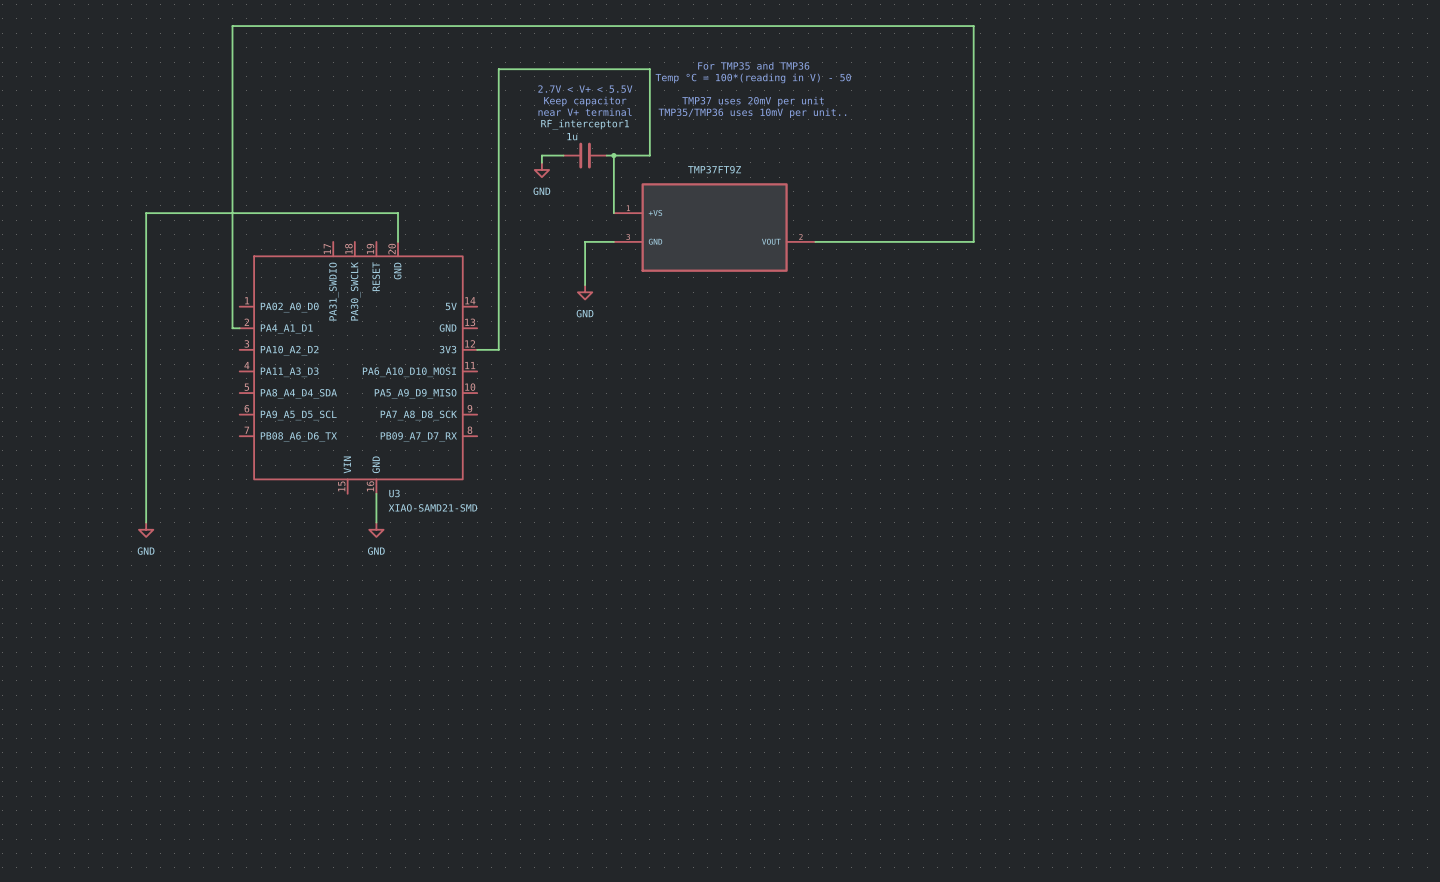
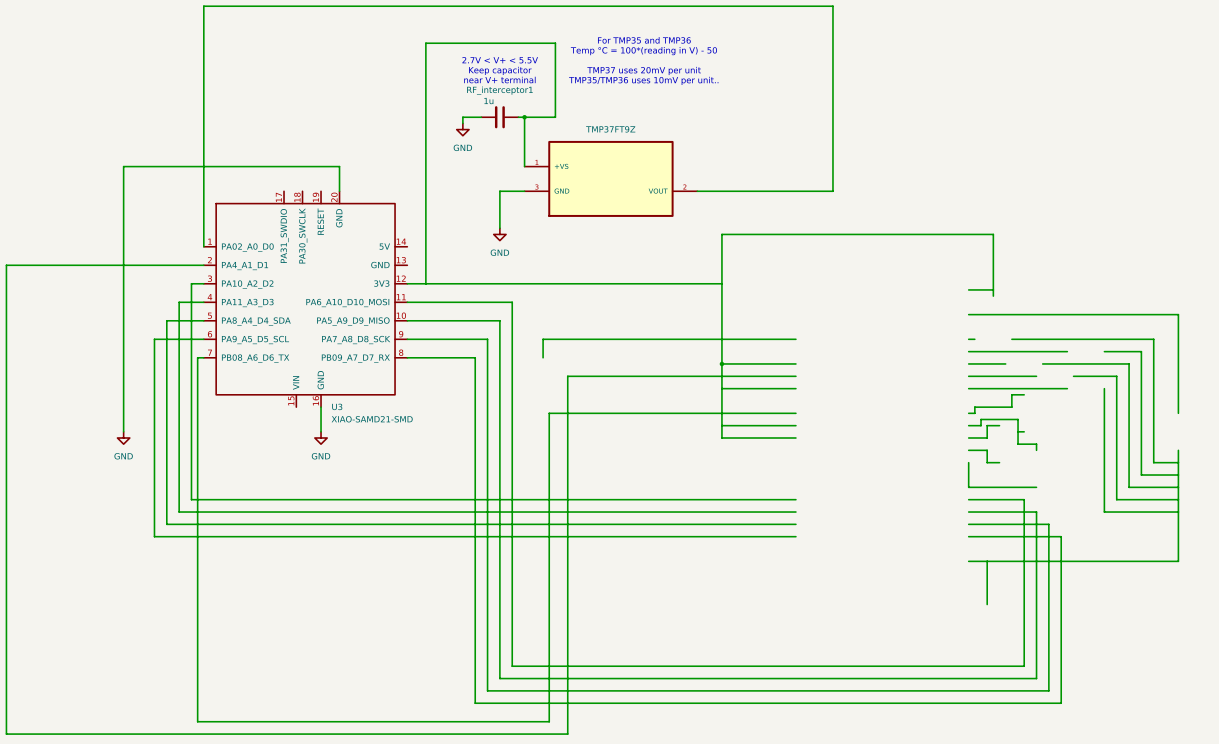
wire: (239, 26) (232, 26) (232, 328) -> (203, 6) (203, 246)
wire: none -> (197, 265) (6, 265) (6, 734) (567, 734) (567, 376) (795, 376)
wire: none -> (203, 283) (191, 283) (191, 499) (795, 499)
wire: none -> (425, 283) (721, 283)
wire: none -> (968, 289) (993, 289)
wire: none -> (993, 296) (993, 234) (721, 234) (721, 437) (795, 437)
wire: none -> (203, 302) (179, 302) (179, 512) (795, 512)
wire: none -> (407, 302) (512, 302) (512, 666) (1024, 666) (1024, 499) (968, 499)
wire: none -> (968, 314) (1178, 314) (1178, 413)
wire: none -> (203, 320) (166, 320) (166, 524) (795, 524)
wire: none -> (407, 320) (499, 320) (499, 678) (1036, 678) (1036, 512) (968, 512)
wire: none -> (203, 339) (154, 339) (154, 536) (795, 536)
wire: none -> (407, 339) (487, 339) (487, 690) (1048, 690) (1048, 524) (968, 524)
wire: none -> (795, 339) (543, 339) (543, 357)
wire: none -> (968, 339) (974, 339)
wire: none -> (1011, 339) (1153, 339) (1153, 462) (1178, 462)
wire: none -> (968, 351) (1067, 351)
wire: none -> (1104, 351) (1141, 351) (1141, 475) (1178, 475)
wire: none -> (203, 357) (197, 357) (197, 721) (549, 721) (549, 413) (795, 413)
wire: none -> (407, 357) (475, 357) (475, 703) (1061, 703) (1061, 536) (968, 536)
wire: none -> (721, 363) (795, 363)
junction: none -> (721, 363)
wire: none -> (968, 363) (1005, 363)
wire: none -> (1042, 363) (1129, 363) (1129, 487) (1178, 487)
wire: none -> (968, 376) (1036, 376)
wire: none -> (1073, 376) (1116, 376) (1116, 499) (1178, 499)
wire: none -> (721, 388) (795, 388)
wire: none -> (968, 388) (1067, 388)
wire: none -> (1104, 388) (1104, 512) (1178, 512)
wire: none -> (1024, 394) (1011, 394) (1011, 407) (974, 407) (974, 413) (968, 413)
wire: none -> (721, 425) (795, 425)
wire: none -> (968, 425) (981, 425) (981, 419) (1018, 419) (1018, 444) (1036, 444) (1036, 450)
wire: none -> (999, 425) (987, 425) (987, 437) (968, 437)
wire: none -> (1018, 431) (1024, 431)
wire: none -> (968, 450) (987, 450) (987, 462) (999, 462)
wire: none -> (1178, 450) (1178, 561) (968, 561)
wire: none -> (968, 462) (968, 487) (1036, 487)
wire: none -> (987, 561) (987, 604)

